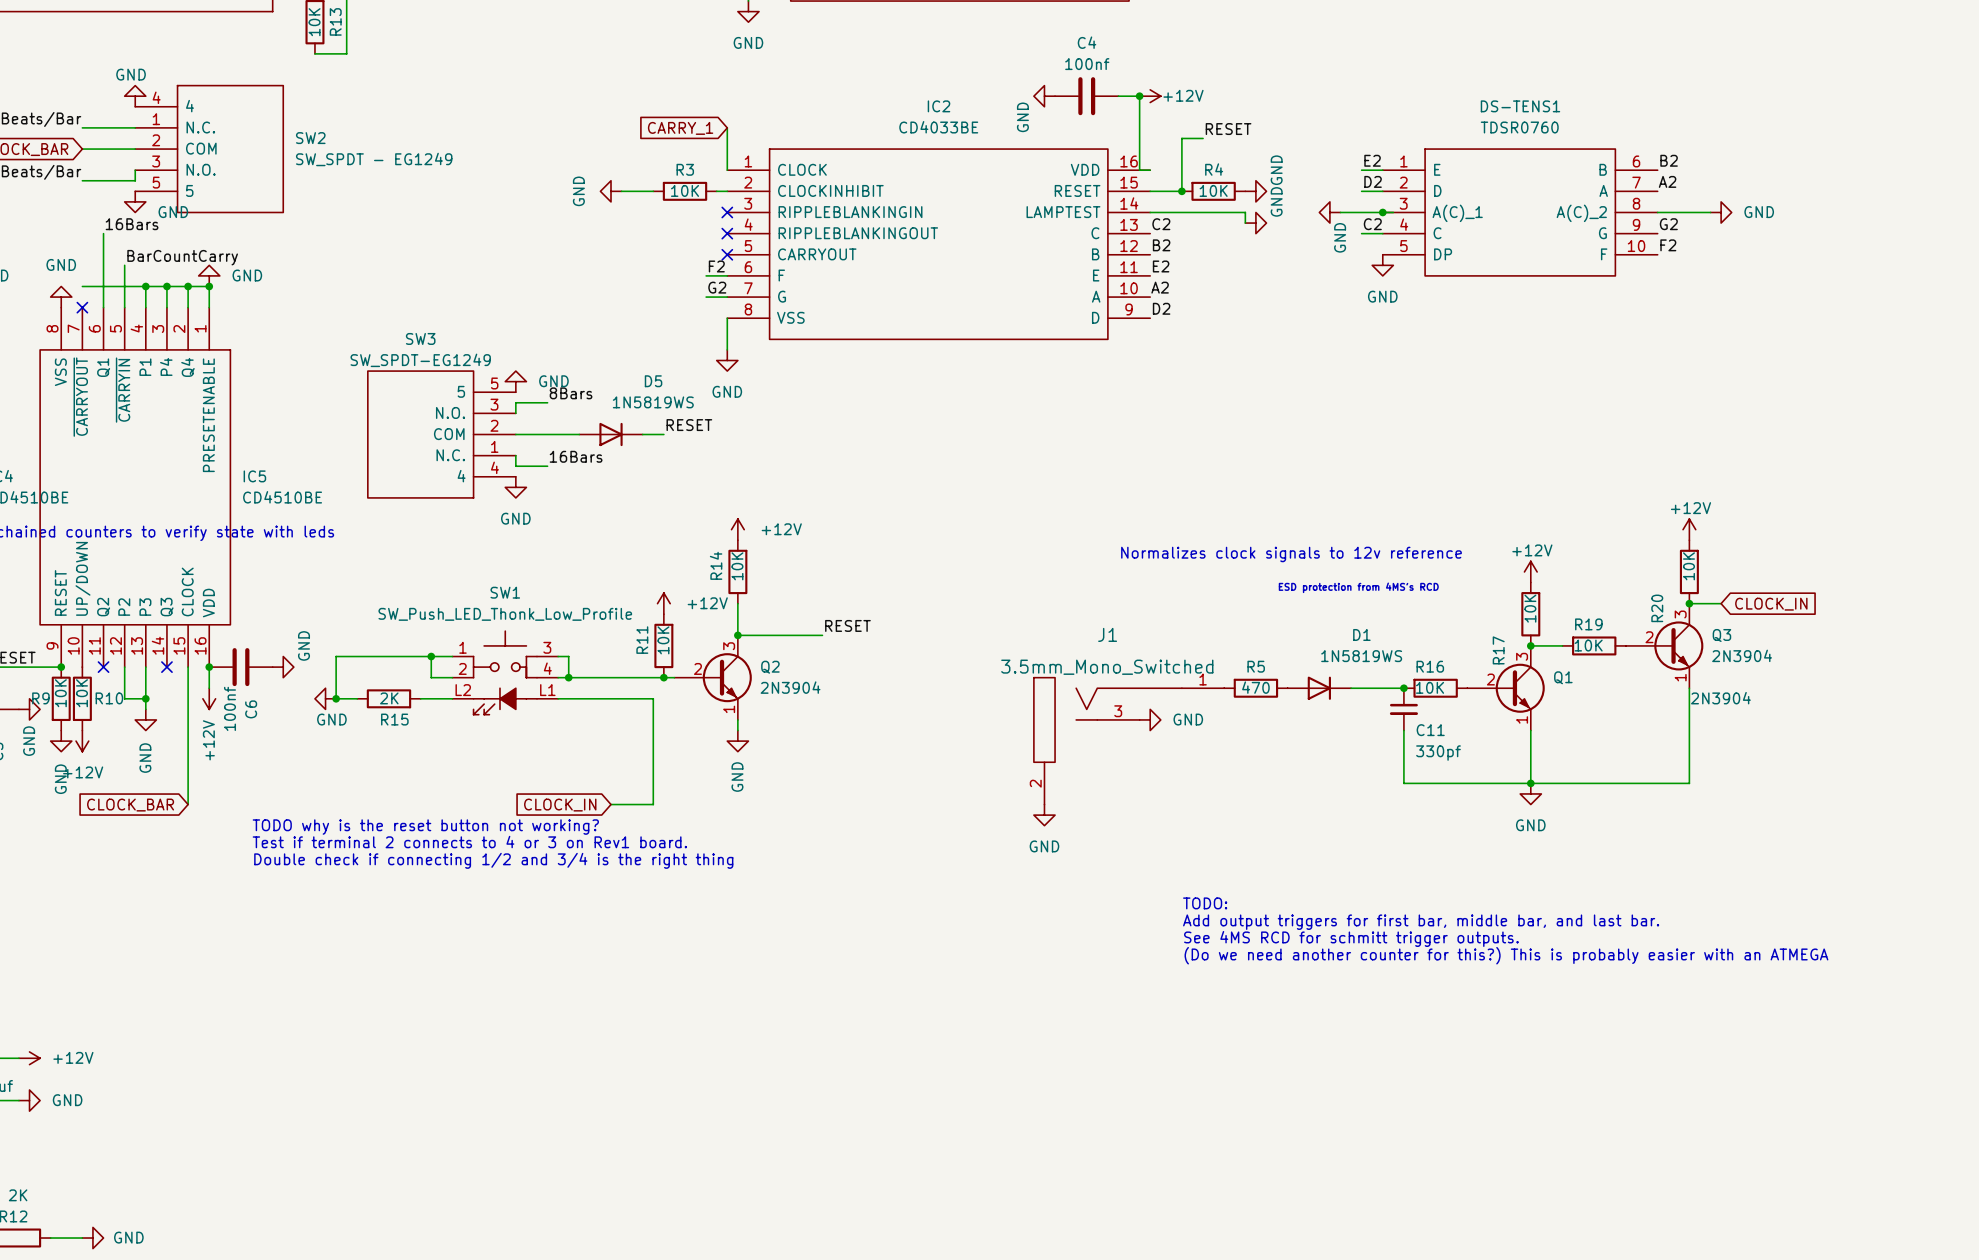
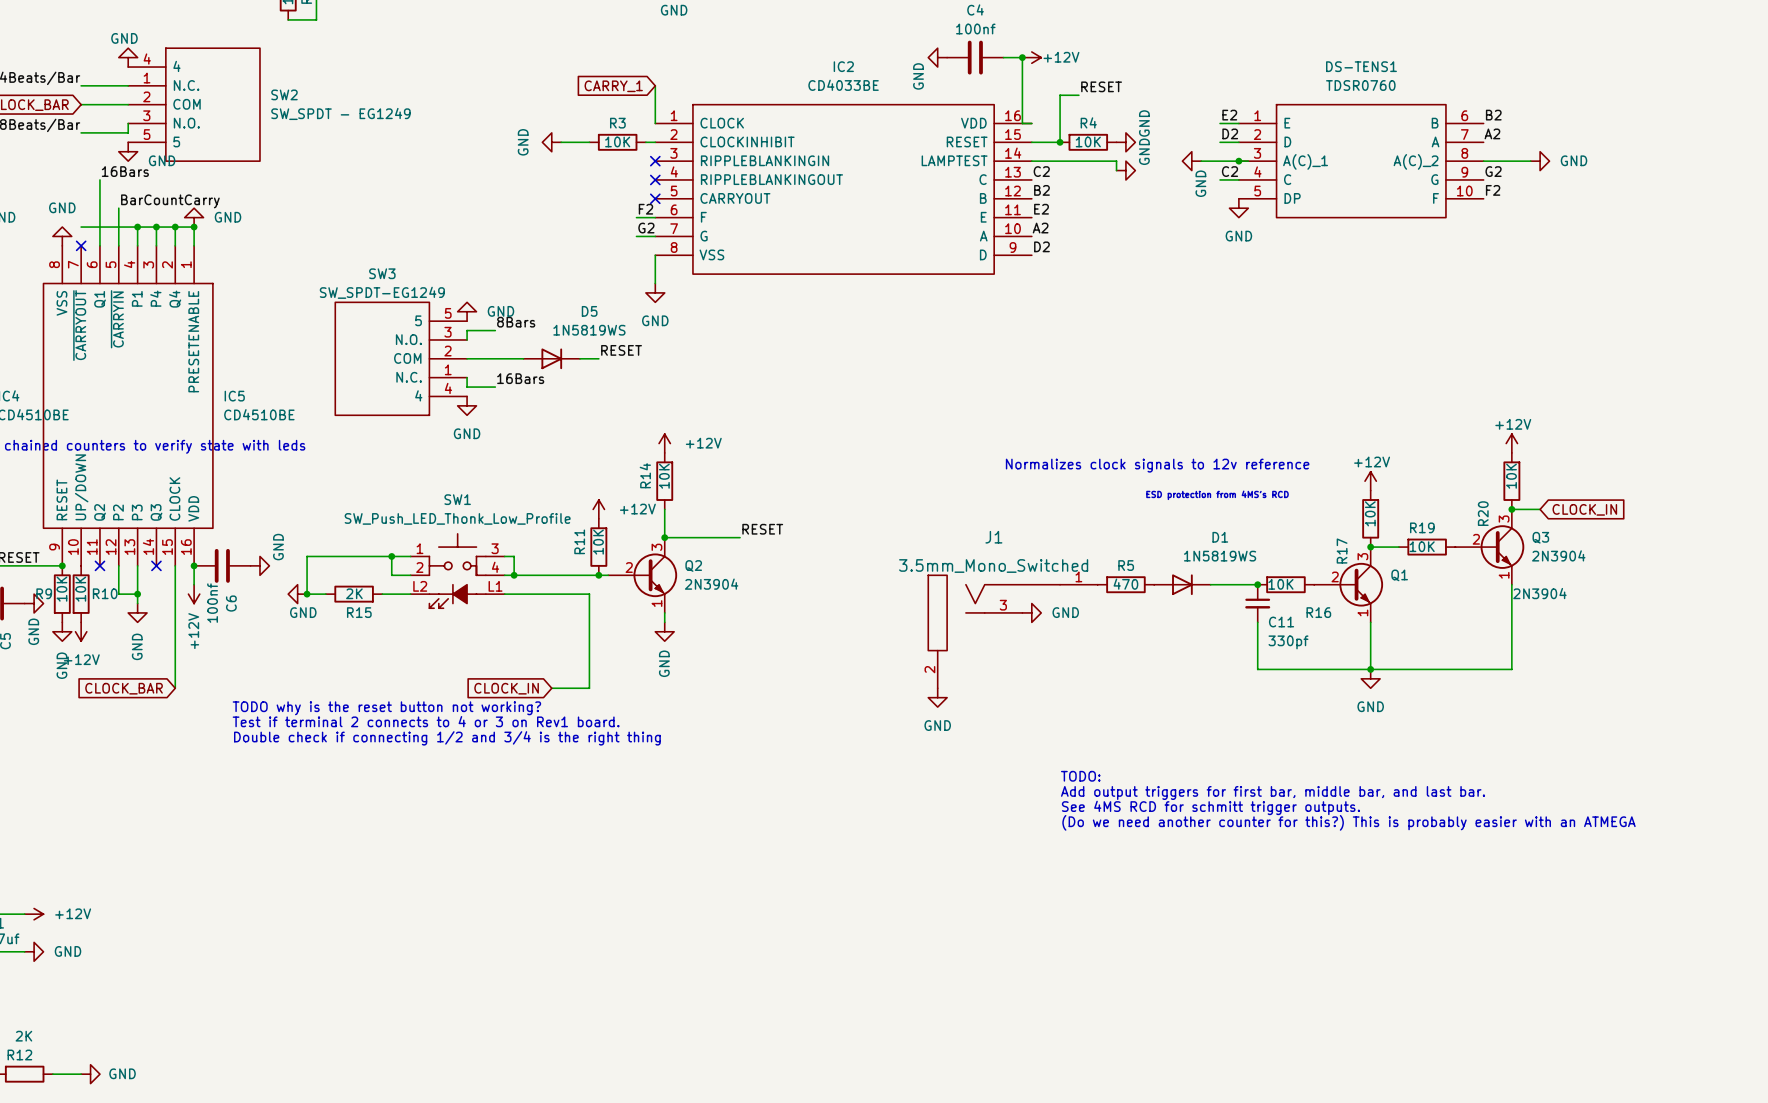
R16 name position: R16 (1430, 666) -> R16 (1318, 612)

